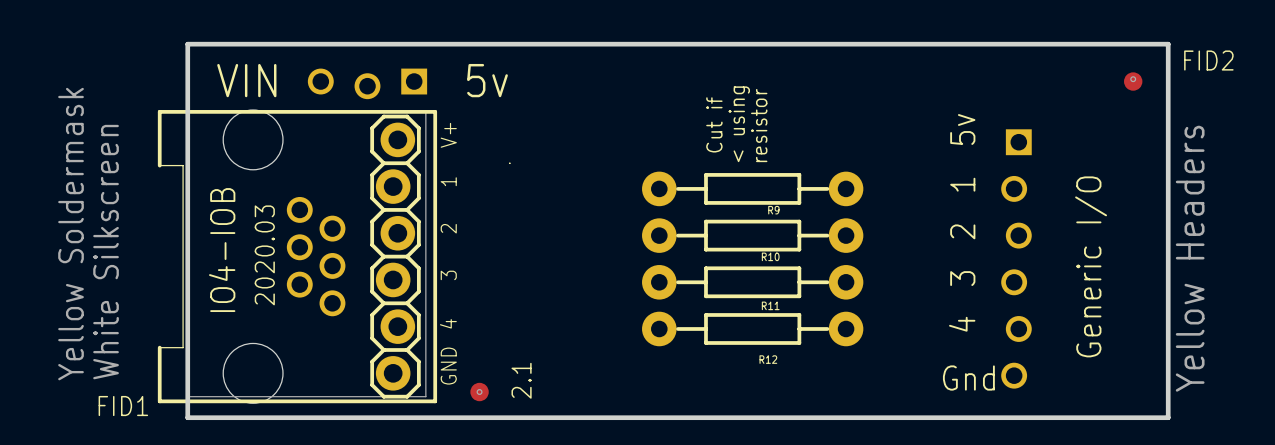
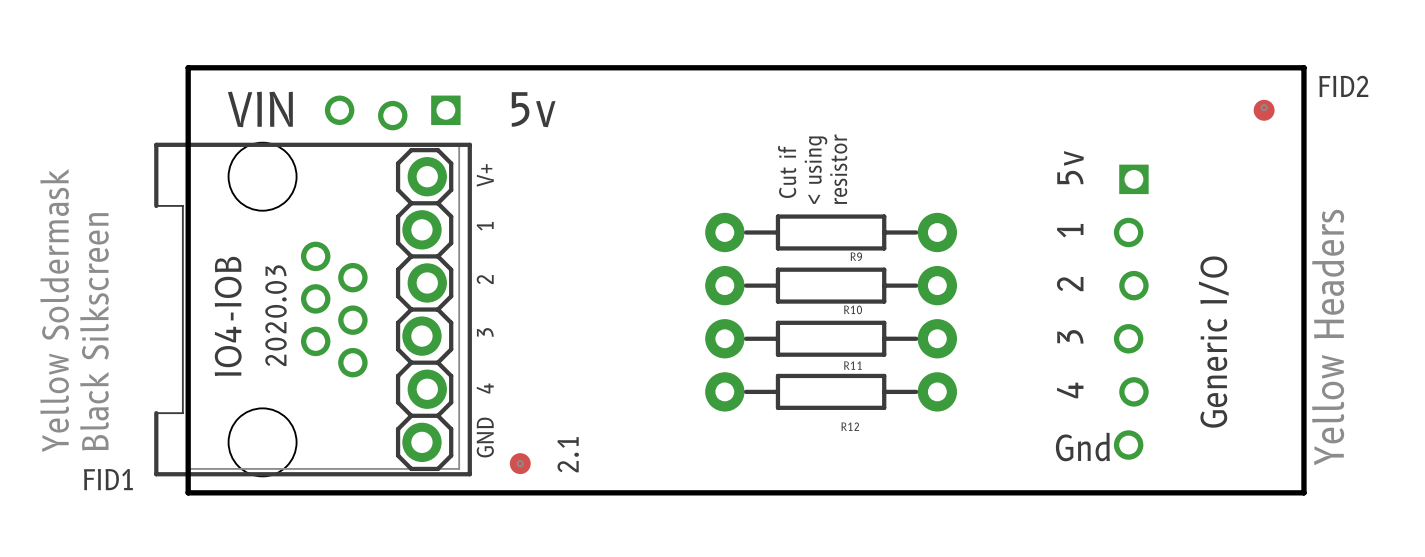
text: White Silkscreen (106, 252) -> Black Silkscreen (94, 331)

